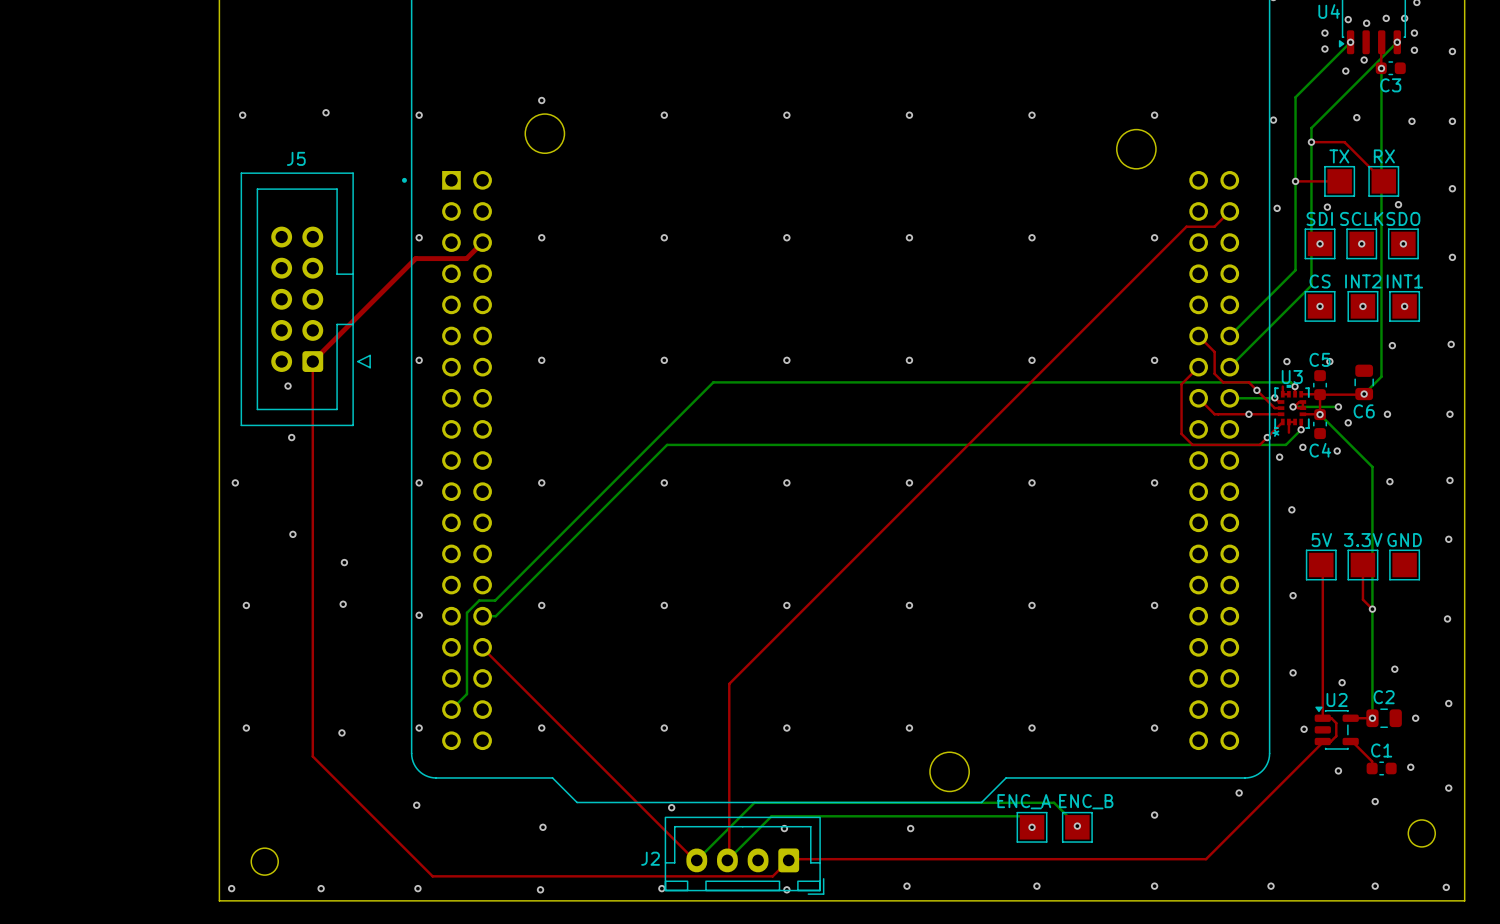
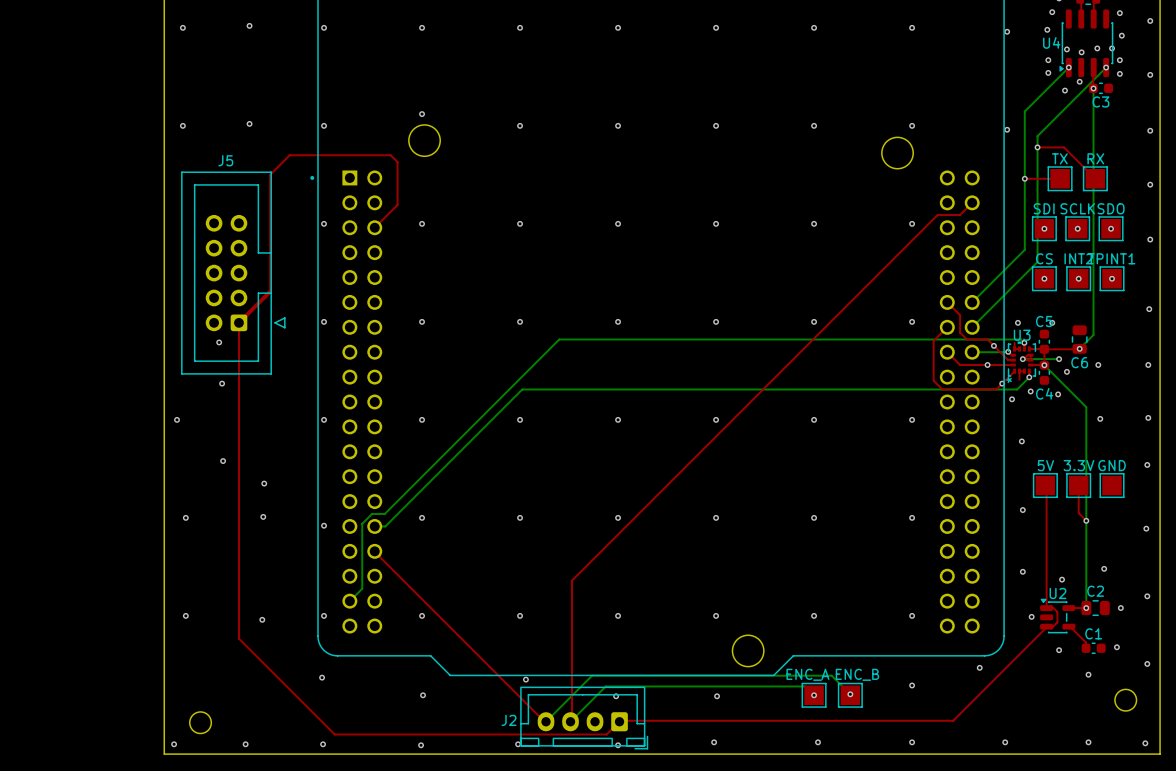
via: (1356, 117) -> none
via: (1411, 121) -> none
via: (1398, 204) -> none
via: (1327, 207) -> none
via: (1277, 208) -> none
top track: (482, 242) (466, 258) (415, 258) (351, 322) -> (374, 227) (397, 204) (397, 162) (390, 155) (289, 155) (270, 174) (270, 291)
INT1 name: INT1 (1404, 281) -> TPINT1 (1111, 258)
via: (1392, 345) -> none

